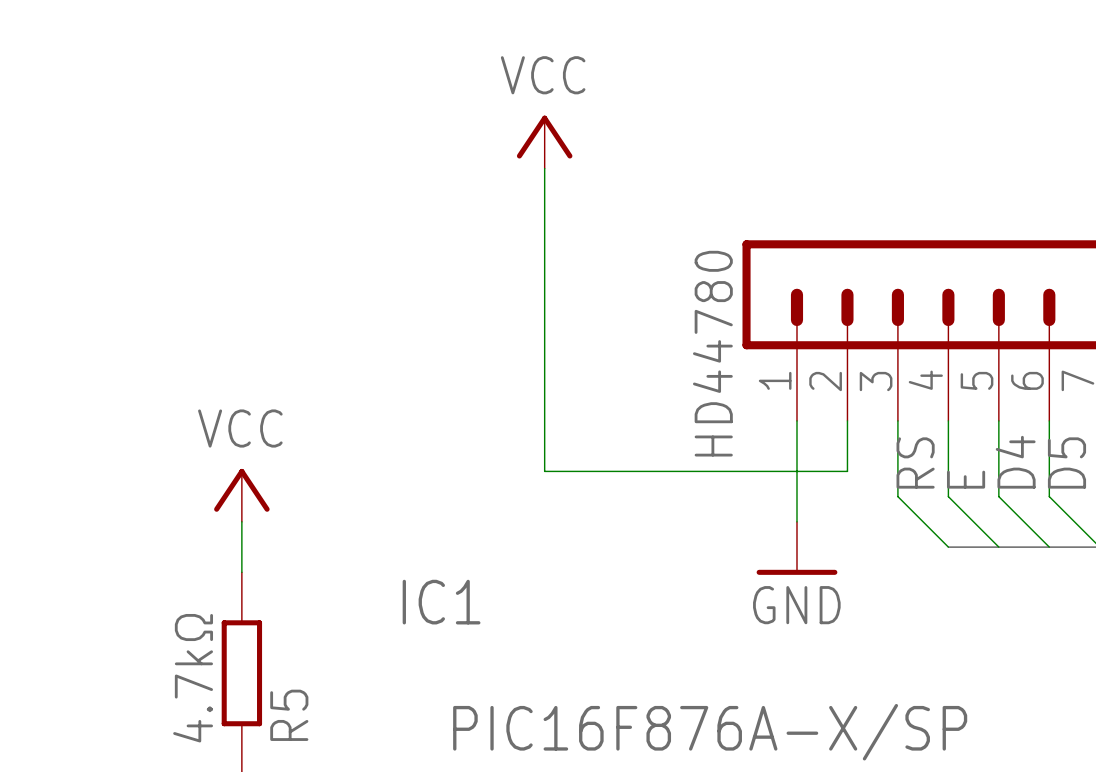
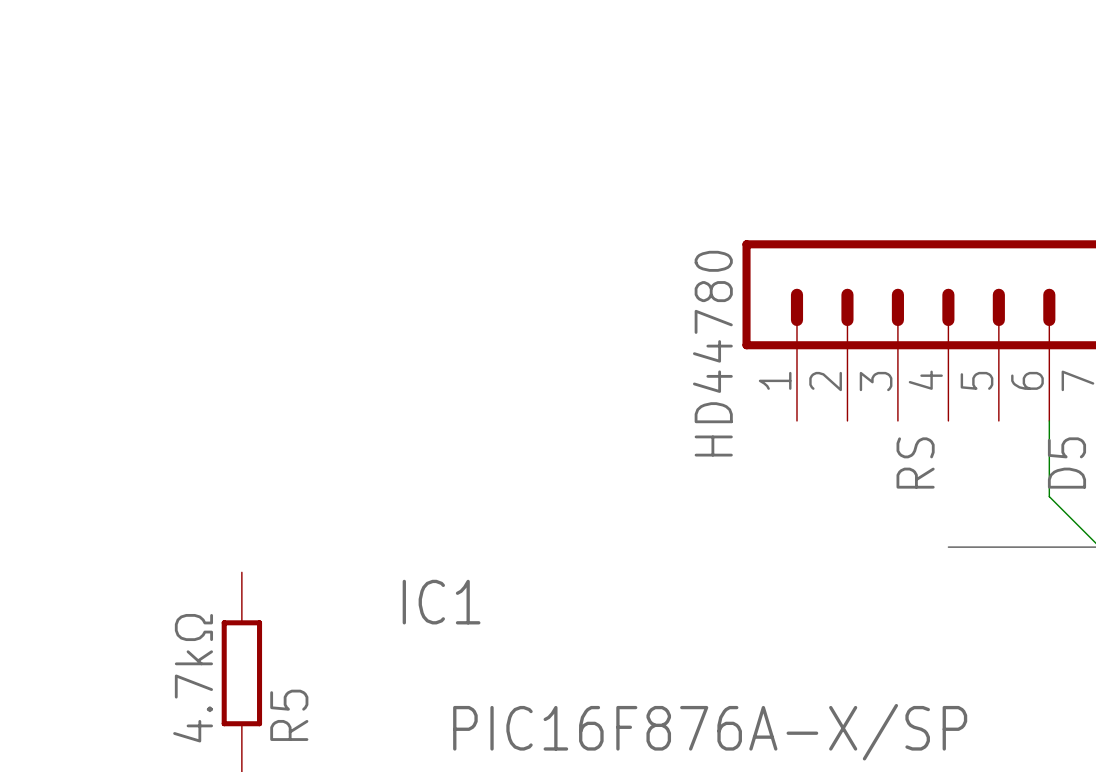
power symbol: VCC (544, 142) -> none
wire: (544, 168) (544, 471) (847, 471) (847, 420) -> none
wire: (796, 420) (796, 521) -> none
wire: (897, 420) (897, 496) (948, 547) -> none
wire: (948, 420) (948, 496) (998, 547) -> none
wire: (998, 420) (998, 496) (1049, 547) -> none
label: D4 (1015, 462) -> none
label: E (966, 479) -> none
power symbol: VCC (241, 495) -> none
wire: (241, 521) (241, 572) -> none
power symbol: GND (796, 548) -> none

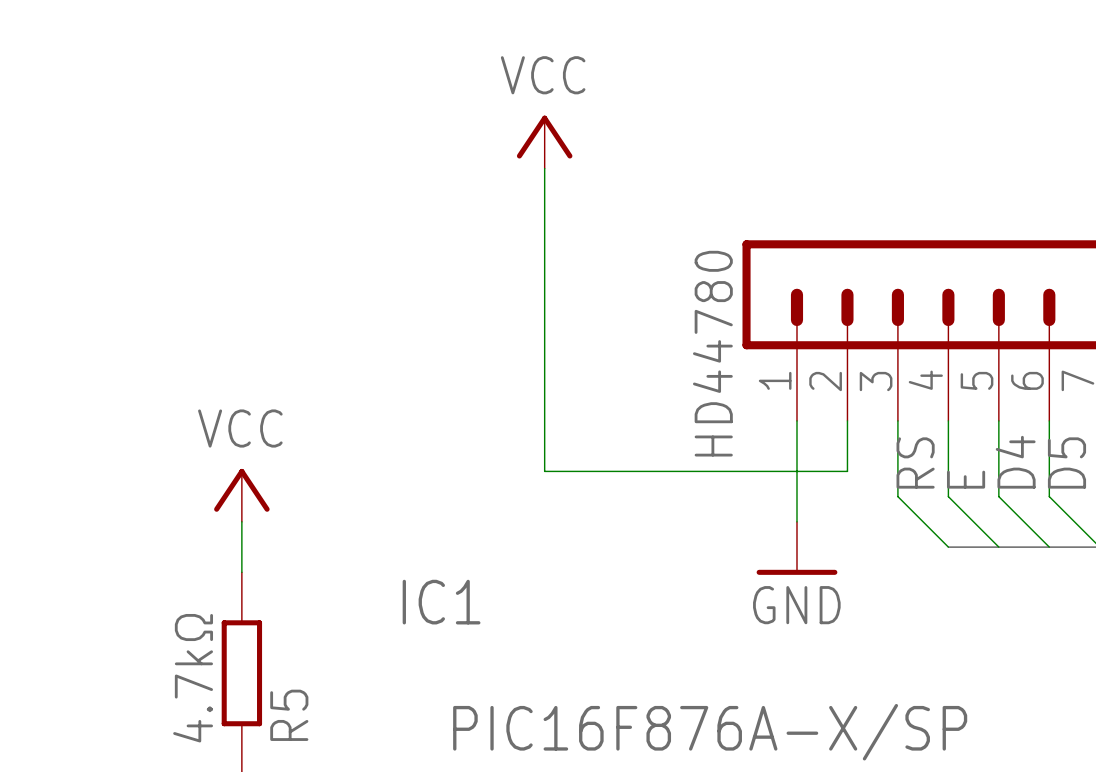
power symbol: none -> VCC (544, 142)
wire: none -> (544, 168) (544, 471) (847, 471) (847, 420)
wire: none -> (796, 420) (796, 521)
wire: none -> (897, 420) (897, 496) (948, 547)
wire: none -> (948, 420) (948, 496) (998, 547)
wire: none -> (998, 420) (998, 496) (1049, 547)
label: none -> D4 (1015, 462)
label: none -> E (966, 479)
power symbol: none -> VCC (241, 495)
wire: none -> (241, 521) (241, 572)
power symbol: none -> GND (796, 548)

